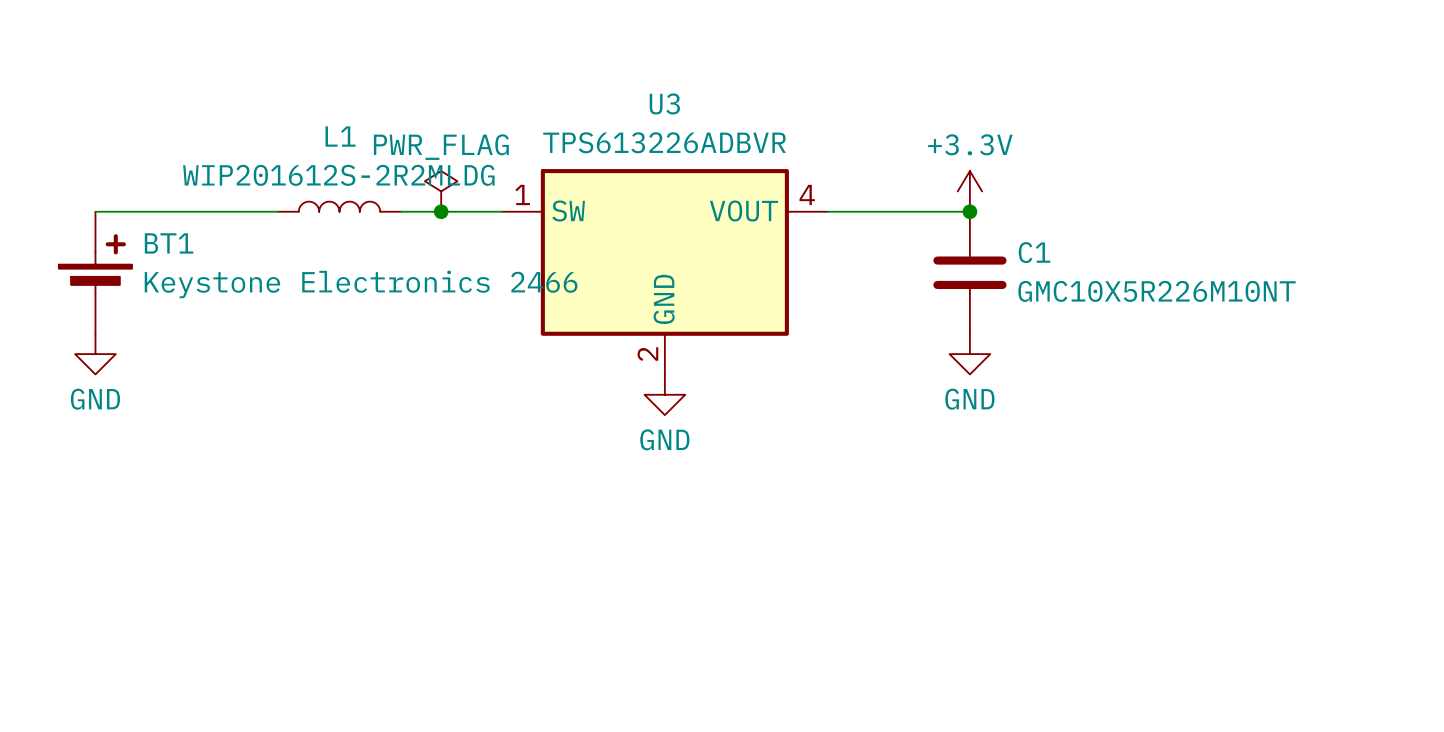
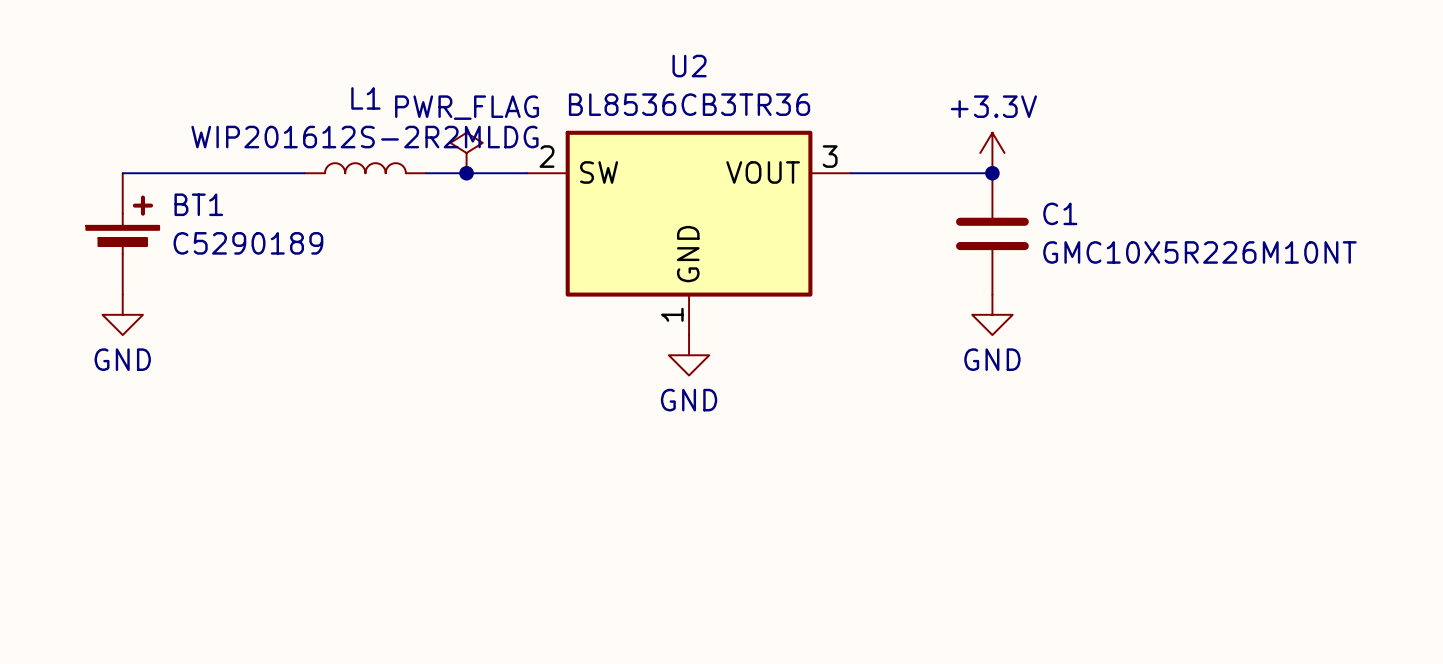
U3 name: U3 (664, 103) -> U2 (689, 66)
U3 value: TPS613226ADBVR (664, 142) -> BL8536CB3TR36 (689, 104)
U3 pin number: 1 (522, 194) -> 2 (546, 156)
U3 pin number: 4 (807, 194) -> 3 (830, 156)
BT1 value: Keystone Electronics 2466 (361, 284) -> C5290189 (248, 243)
U3 pin number: 2 (647, 354) -> 1 (672, 314)

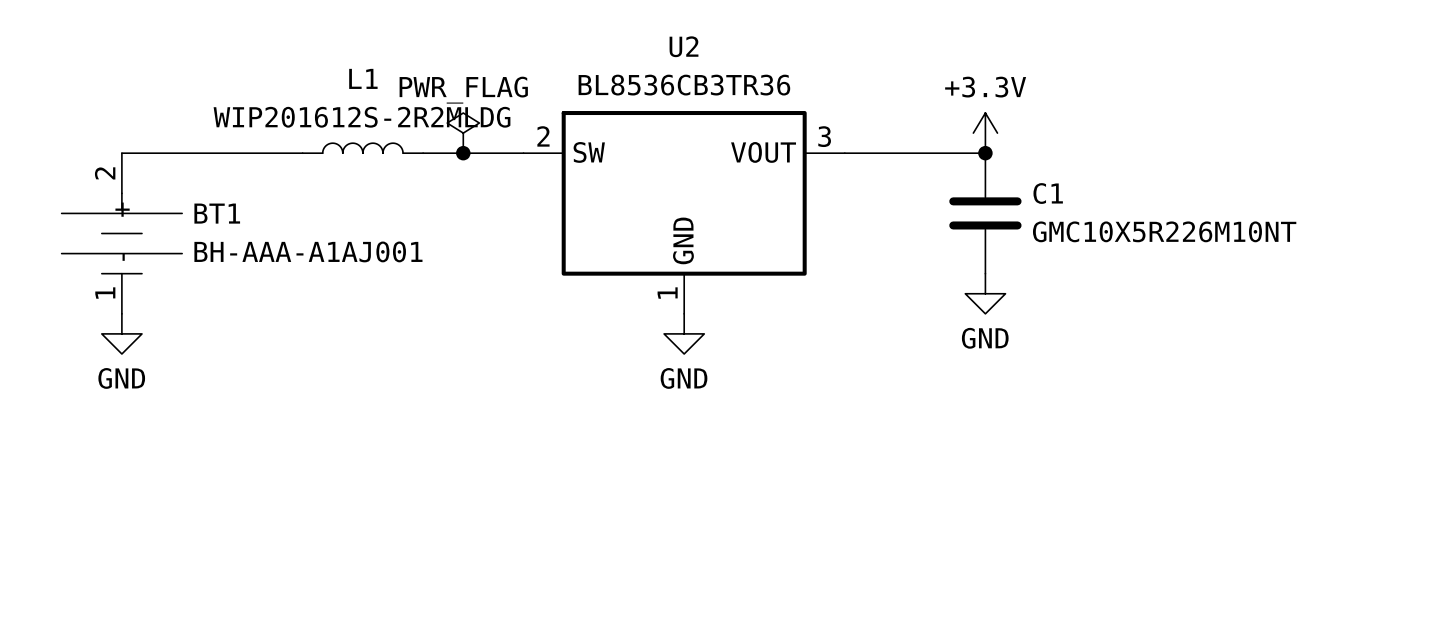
BT1 symbol: [86, 173, 160, 295] -> [61, 153, 183, 314]
BT1 value: C5290189 (248, 243) -> BH-AAA-A1AJ001 (308, 251)
power symbol position: GND (122, 314) -> GND (121, 333)

